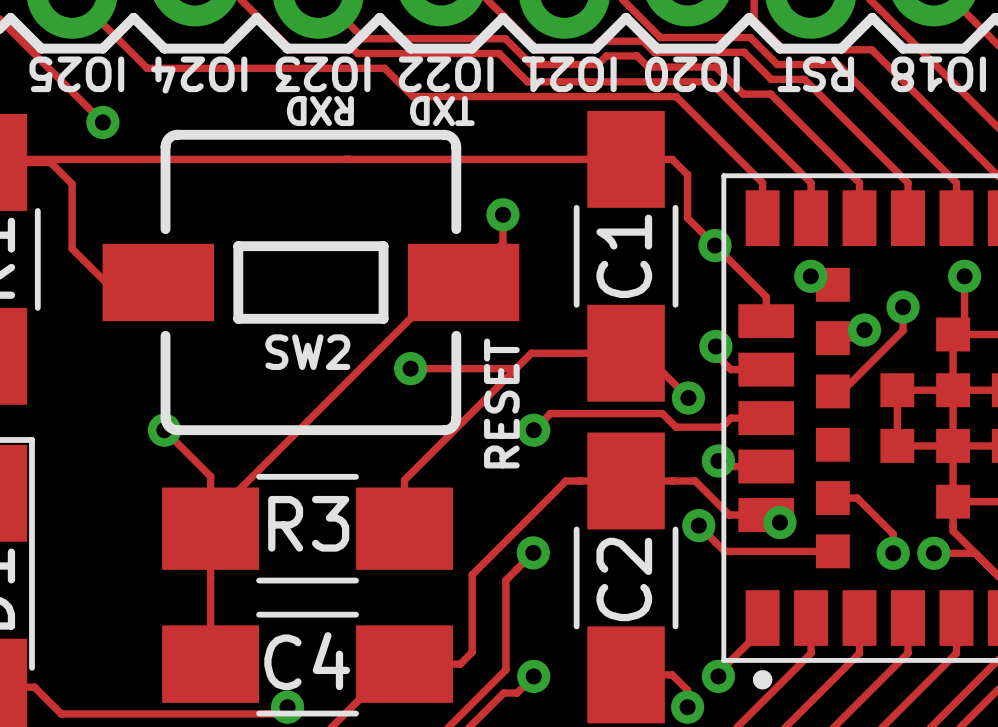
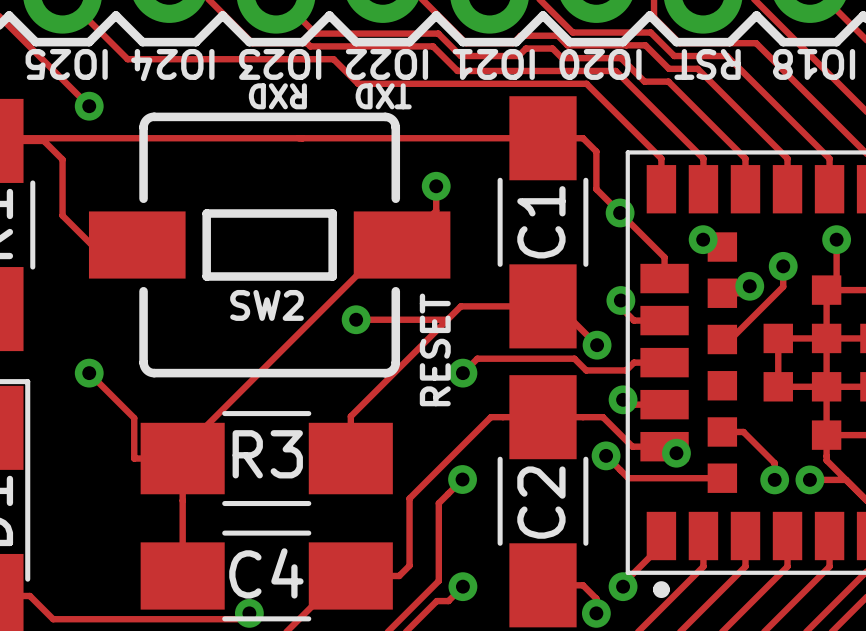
track: none -> (89, 373) (134, 418) (134, 458) (182, 458)
track: (164, 430) (210, 476) (210, 518) -> none
via position: (164, 430) -> (89, 373)

